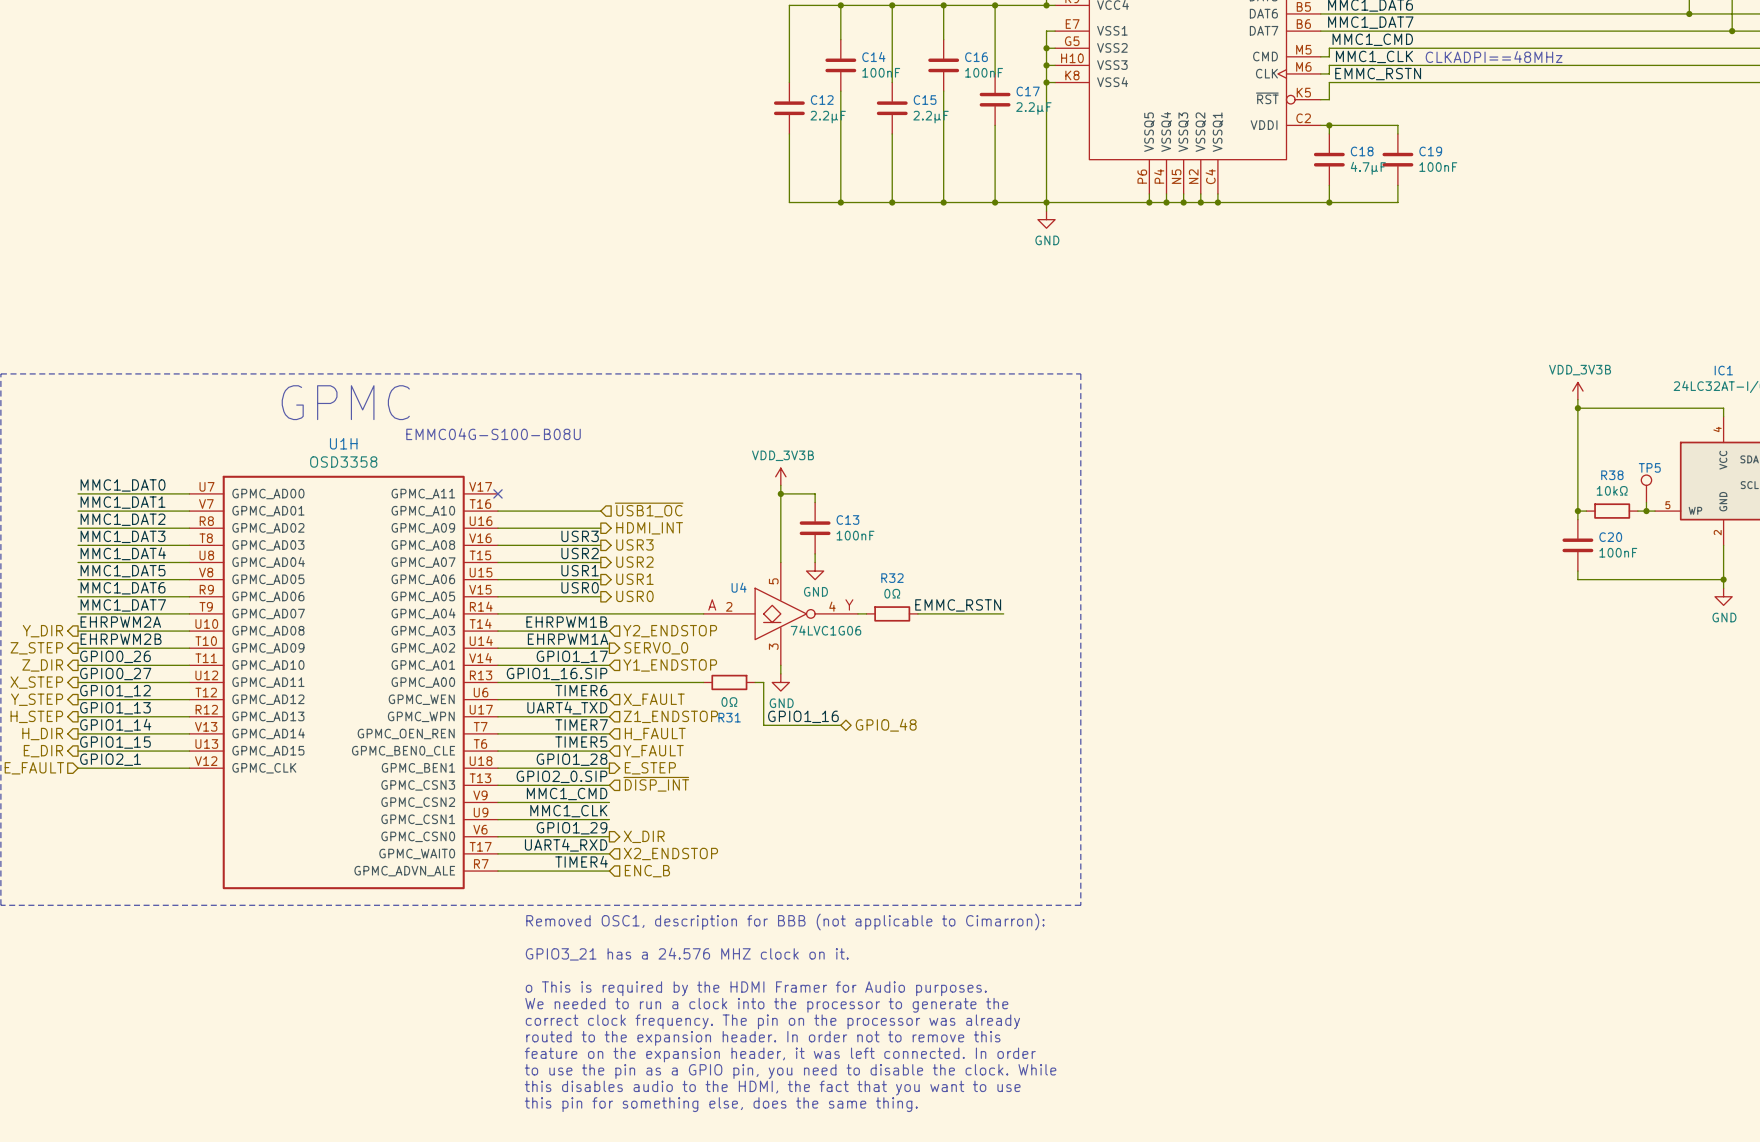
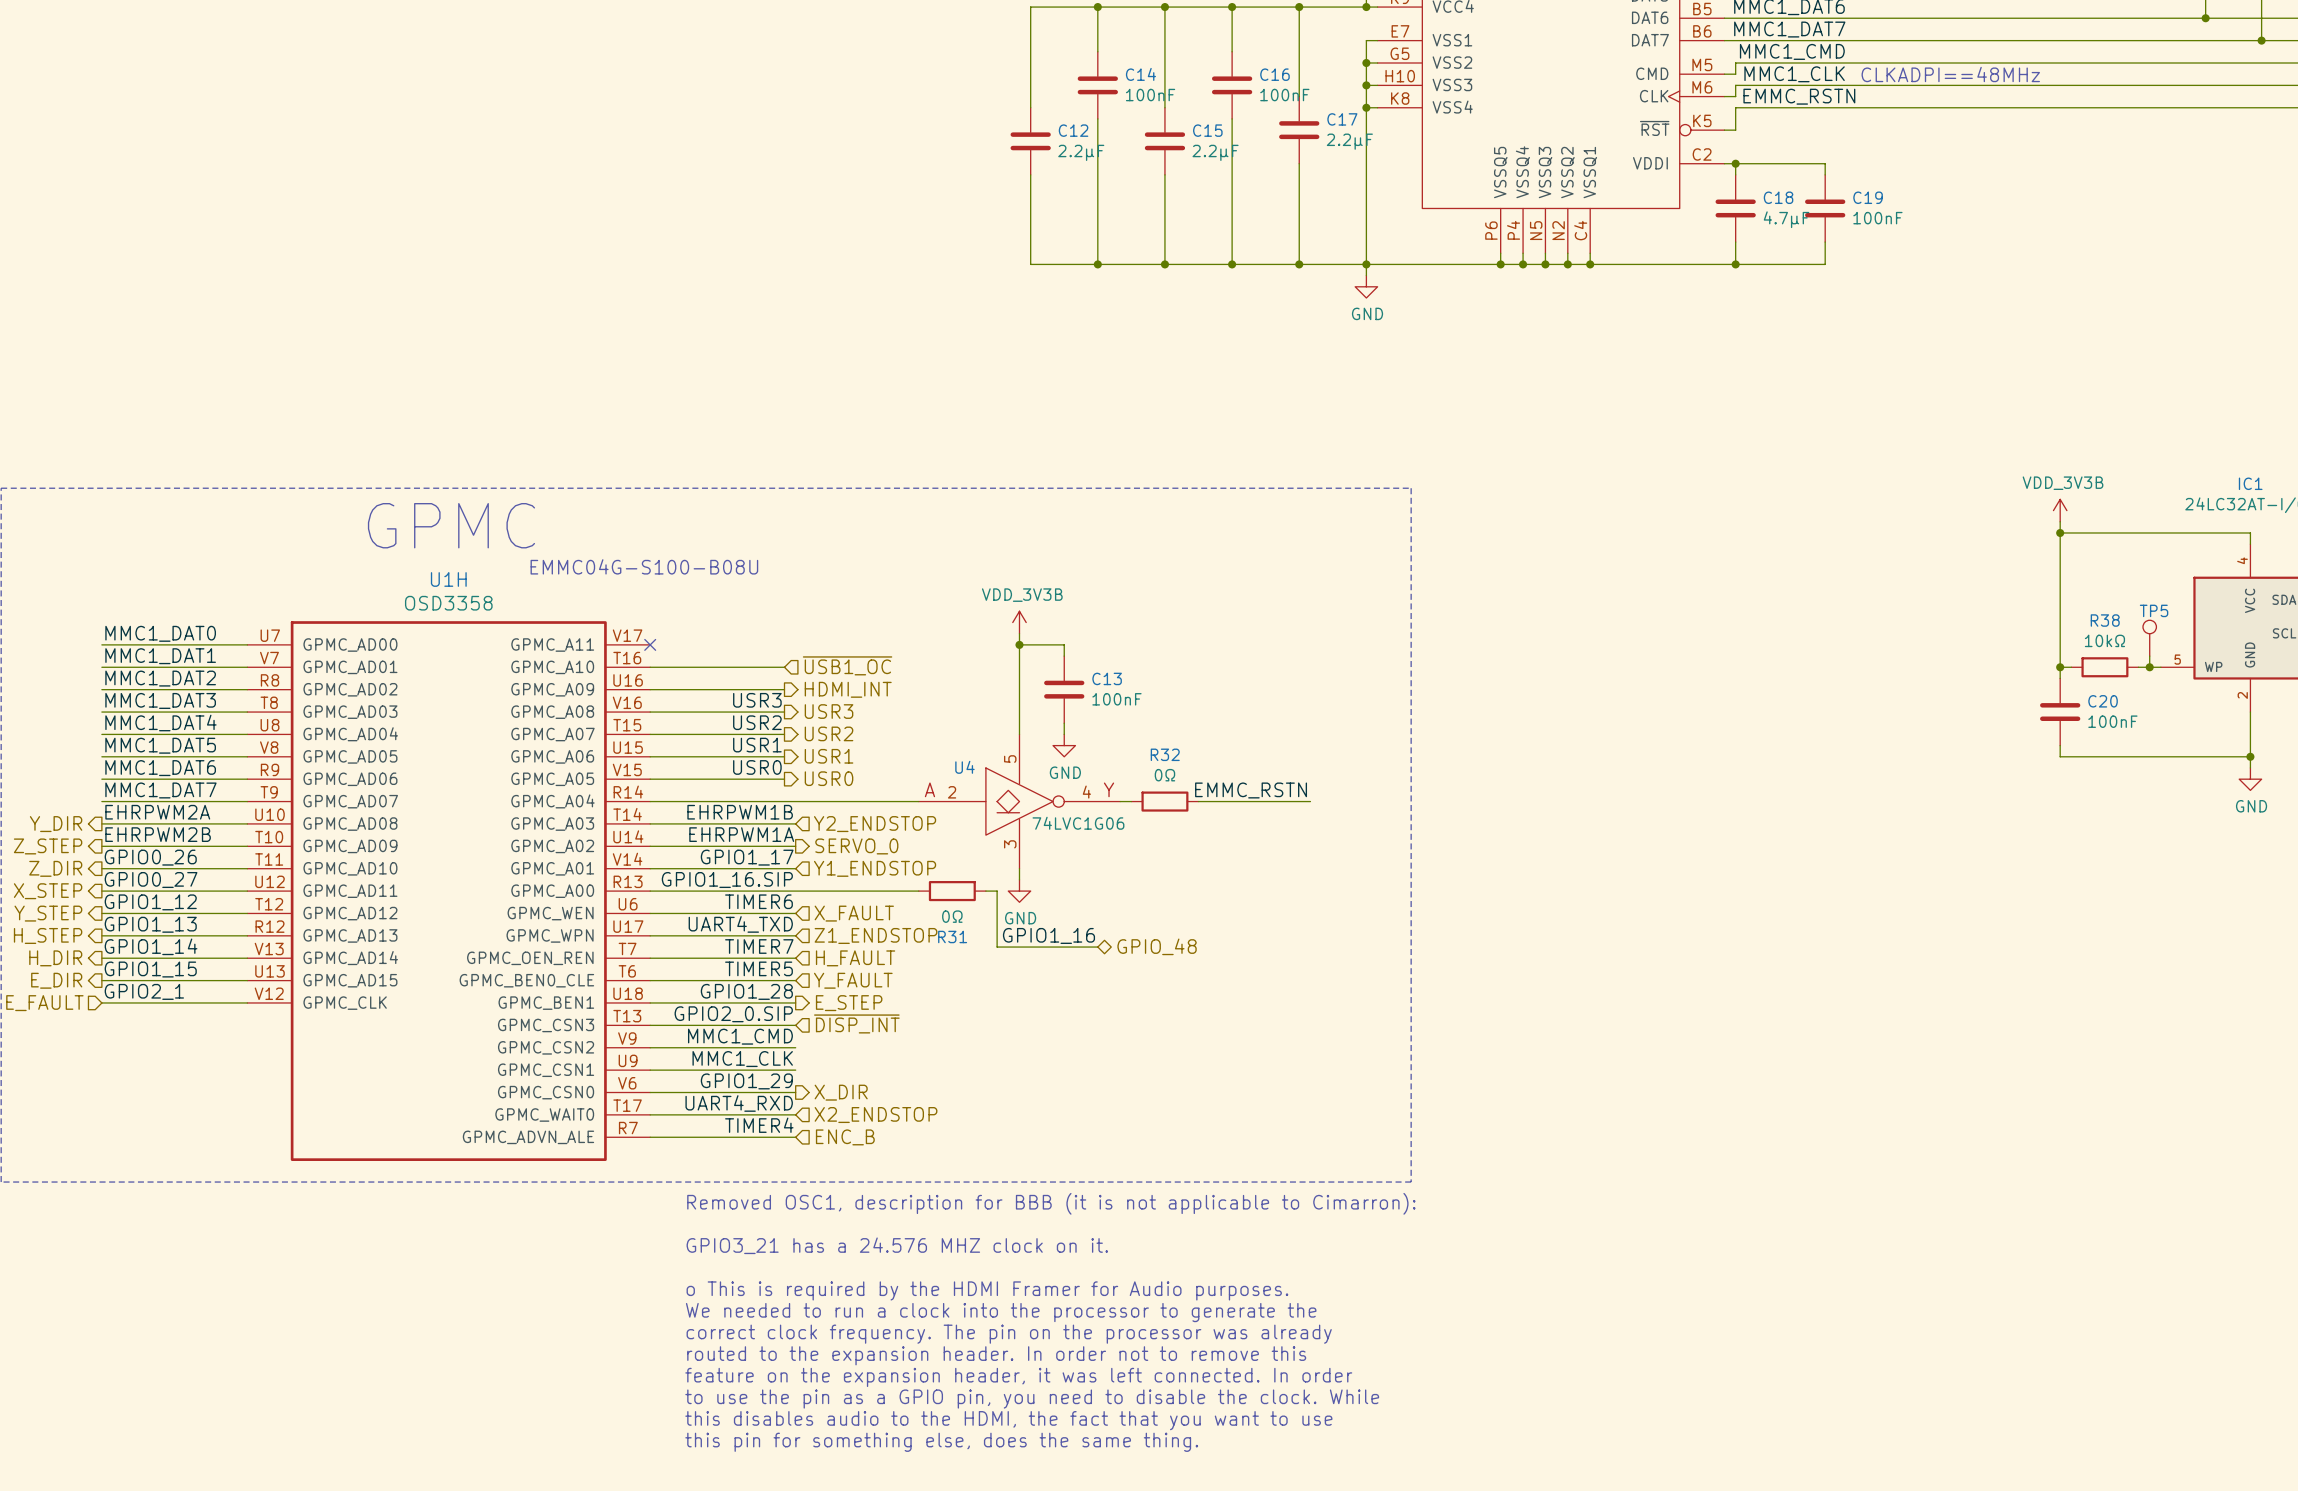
text: Removed OSC1, description for BBB (not applicable to Cimarron): (785, 922) -> Removed OSC1, description for BBB (it is not applicable to Cimarron): (1051, 1203)

